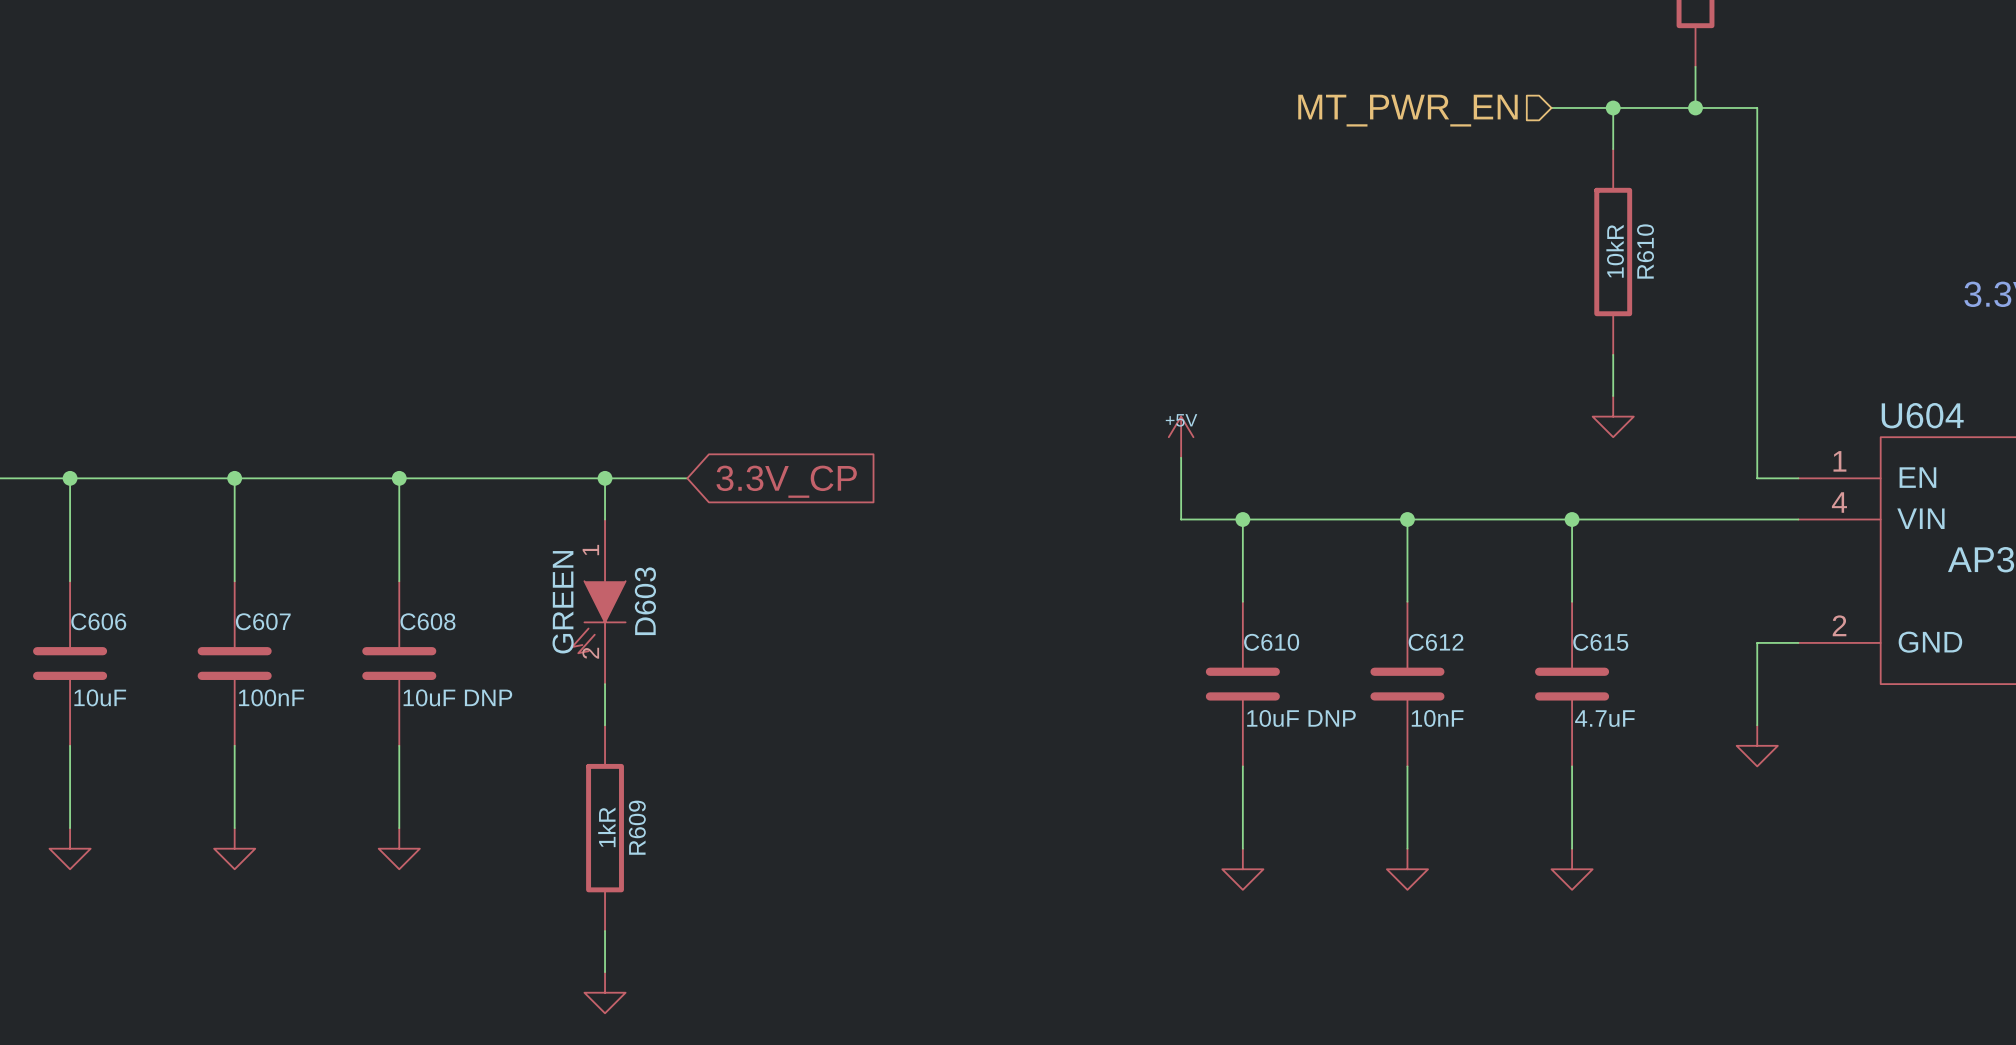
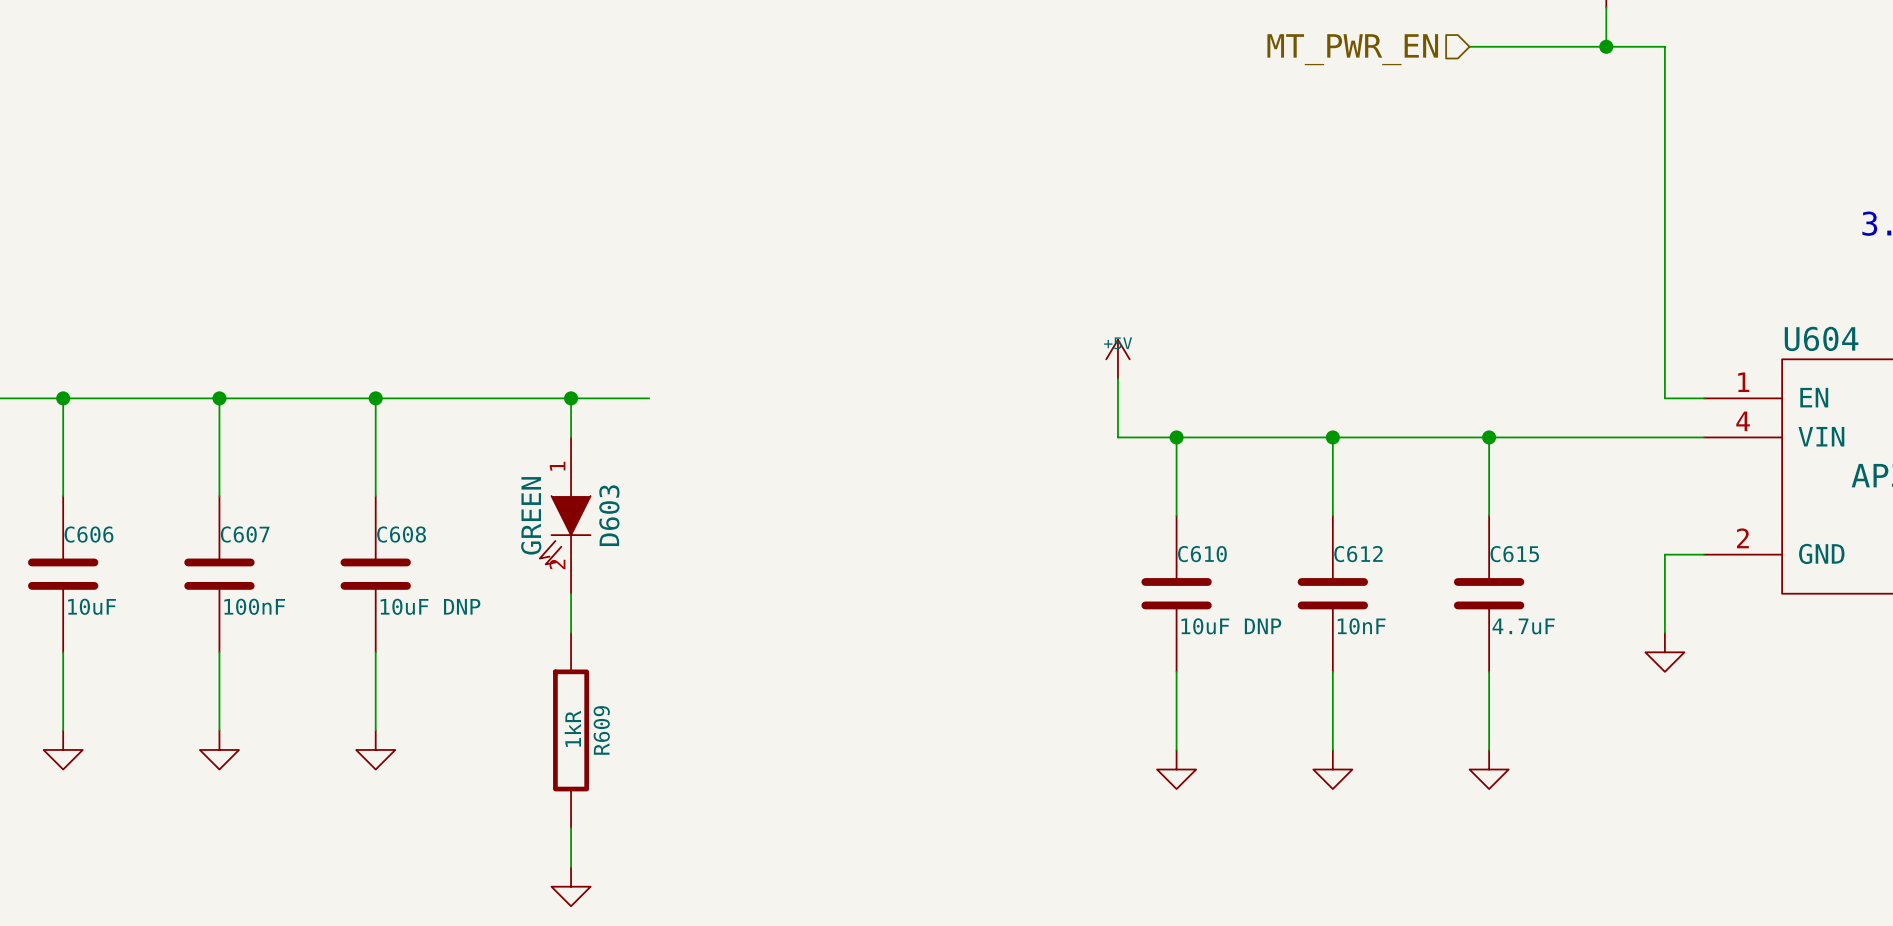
wire: (1613, 107) (1613, 149) -> none
junction: (1613, 107) -> none
R610: 10kR (1613, 252) -> none
wire: (1613, 354) (1613, 396) -> none
power symbol: (1613, 416) -> none
global label: 3.3V_CP (786, 481) -> none

